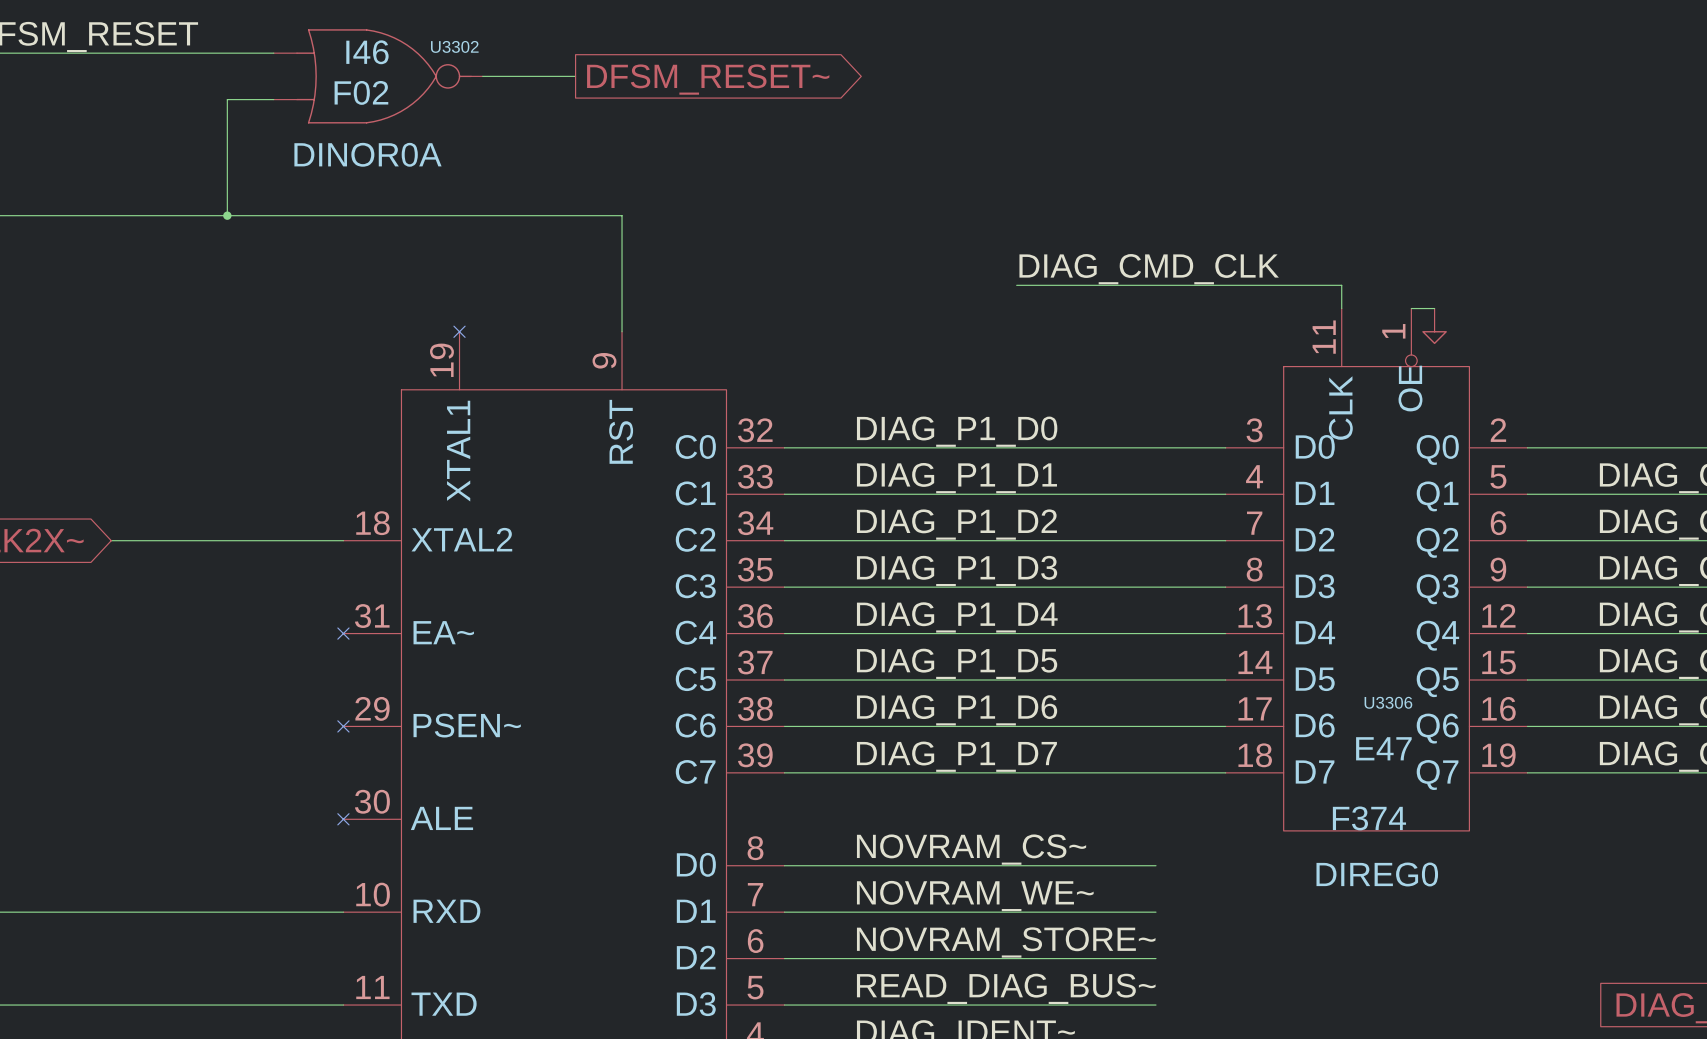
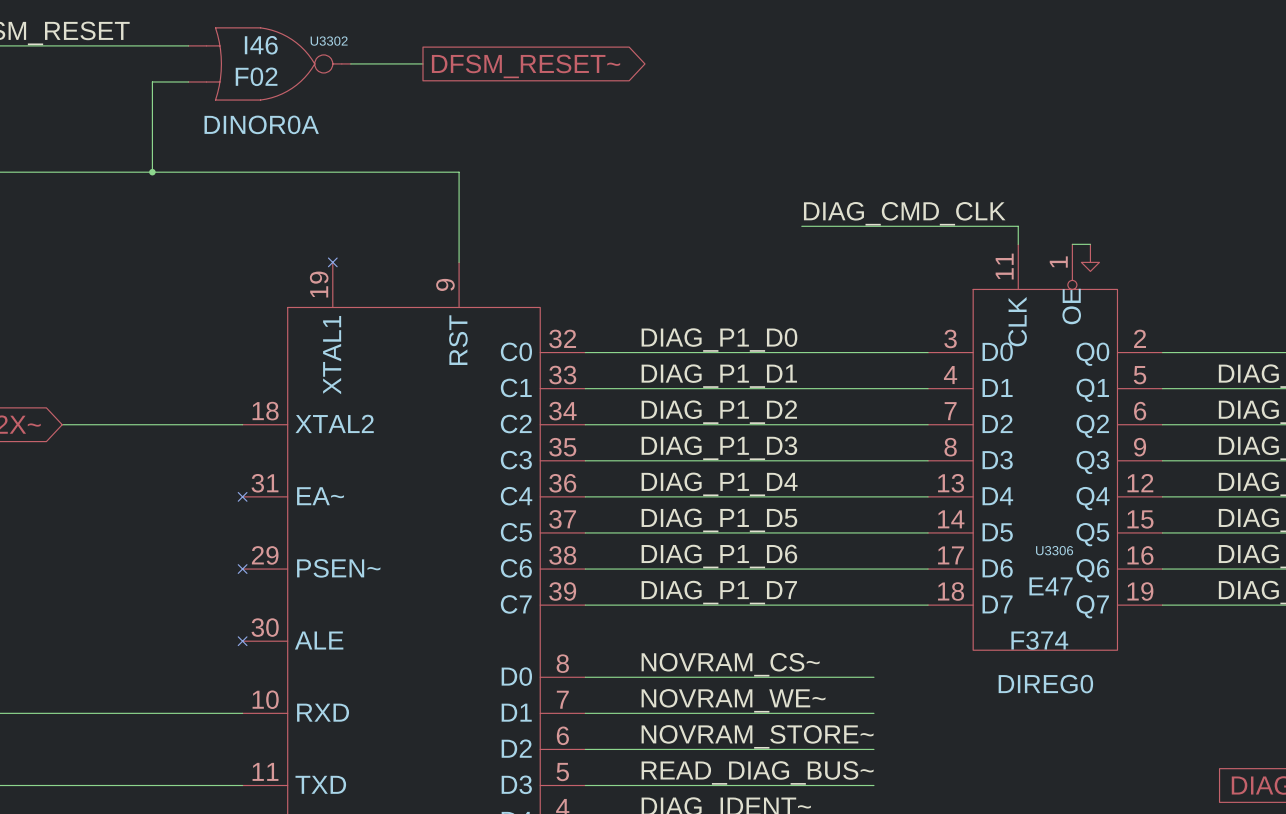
label position: DIAG_CMD_CLK (1149, 269) -> DIAG_CMD_CLK (904, 213)
wire: (1016, 285) (1063, 285) -> none

